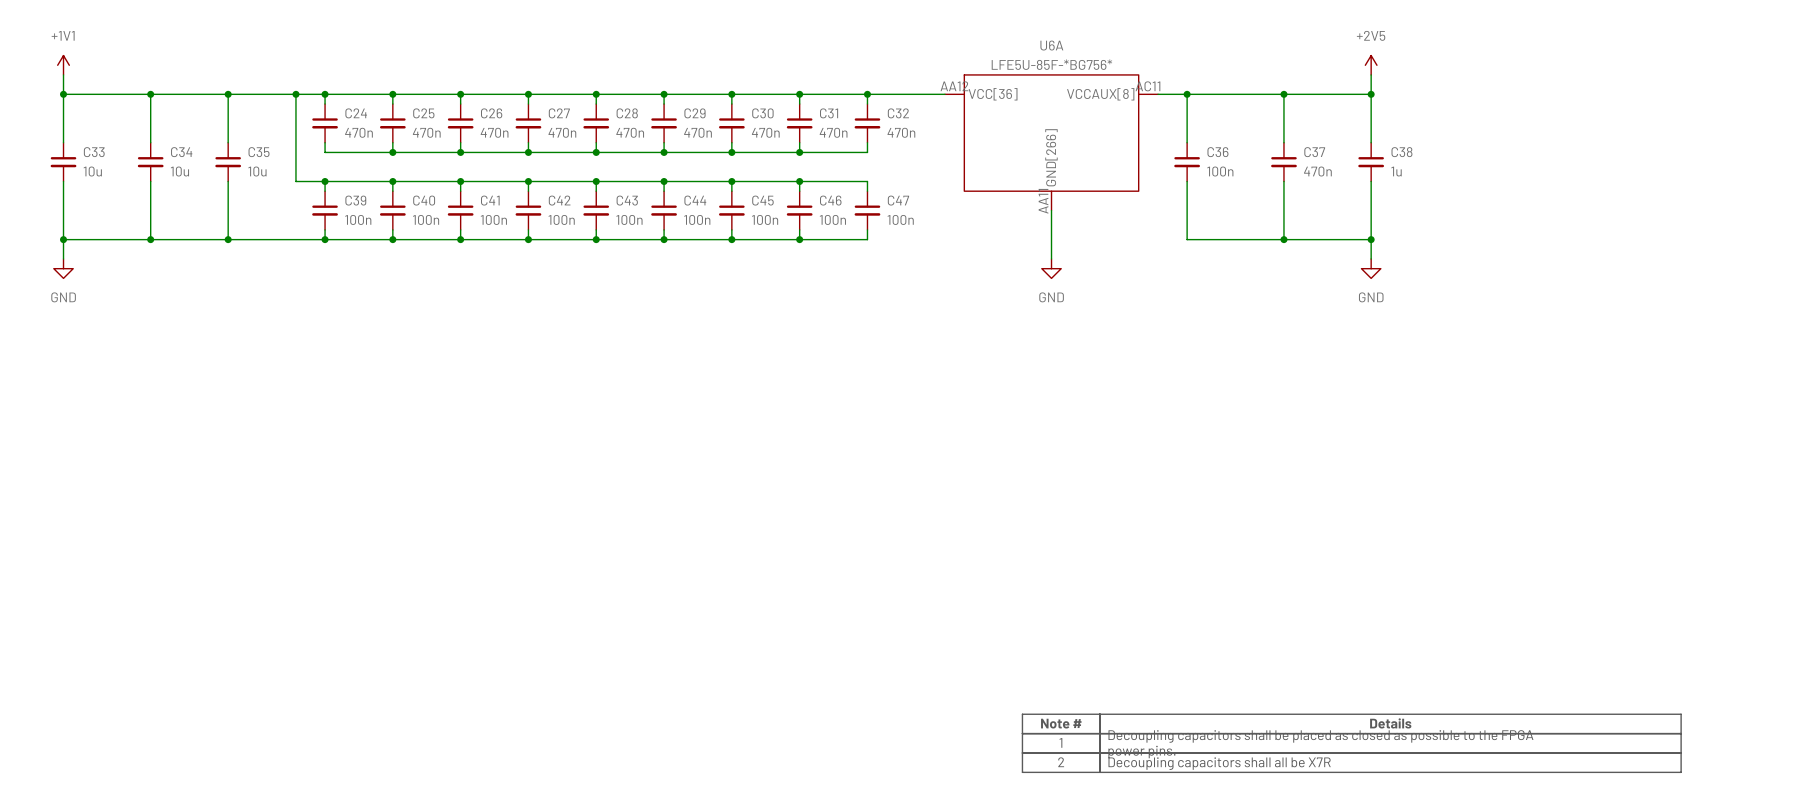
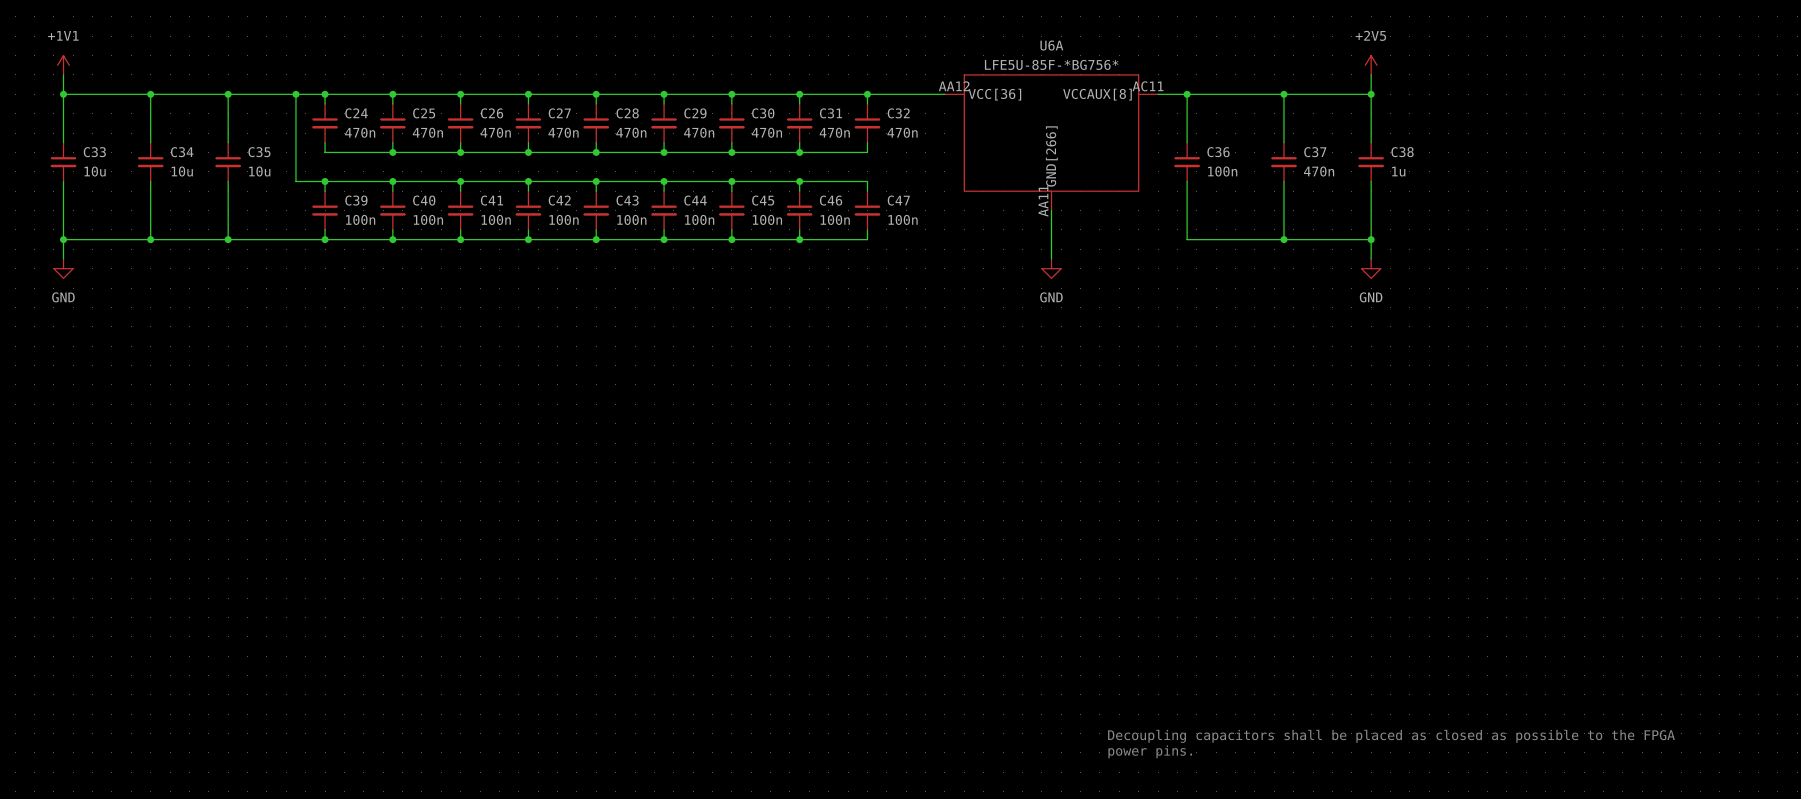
line: (1022, 714) (1681, 714) (1681, 772) (1022, 772) (1022, 714) -> none
line: (1099, 714) (1099, 772) -> none
text: Note # (1061, 723) -> none
text: Details (1390, 723) -> none
line: (1022, 733) (1681, 733) -> none
text: 1 (1060, 742) -> none
line: (1022, 752) (1681, 752) -> none
text: 2 (1061, 762) -> none
text: Decoupling capacitors shall all be X7R (1219, 763) -> none

